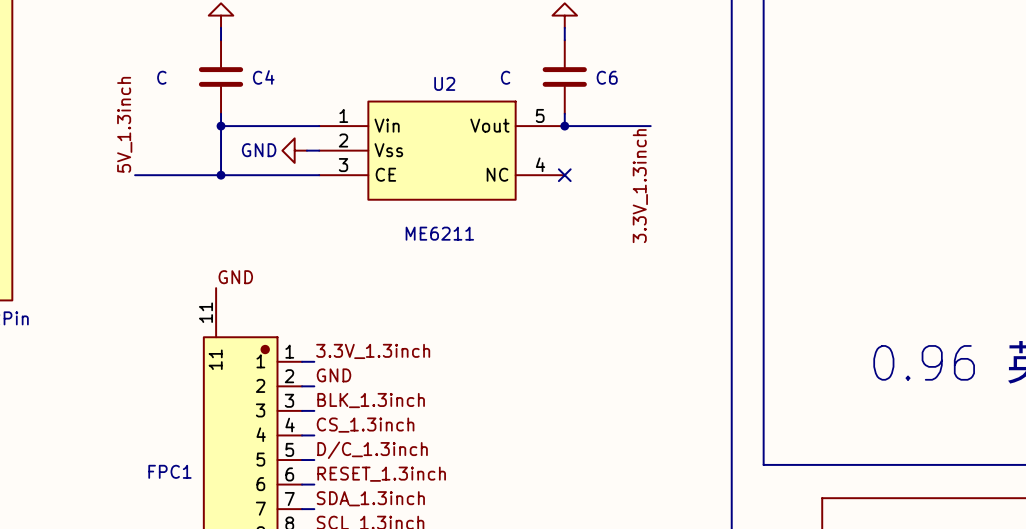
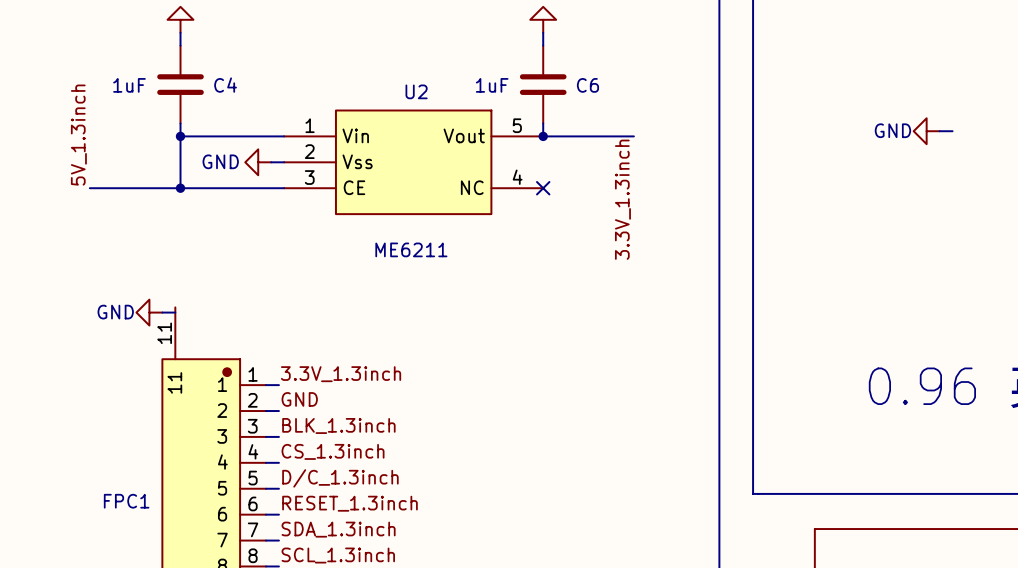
C4 value: C (161, 77) -> 1uF (129, 85)
C6 value: C (505, 77) -> 1uF (492, 85)
power symbol: none -> GND (926, 131)
wire: none -> (939, 131) (952, 131)
label: GND (235, 277) -> none
power symbol: none -> GND (149, 312)
wire: none -> (162, 312) (175, 312)

